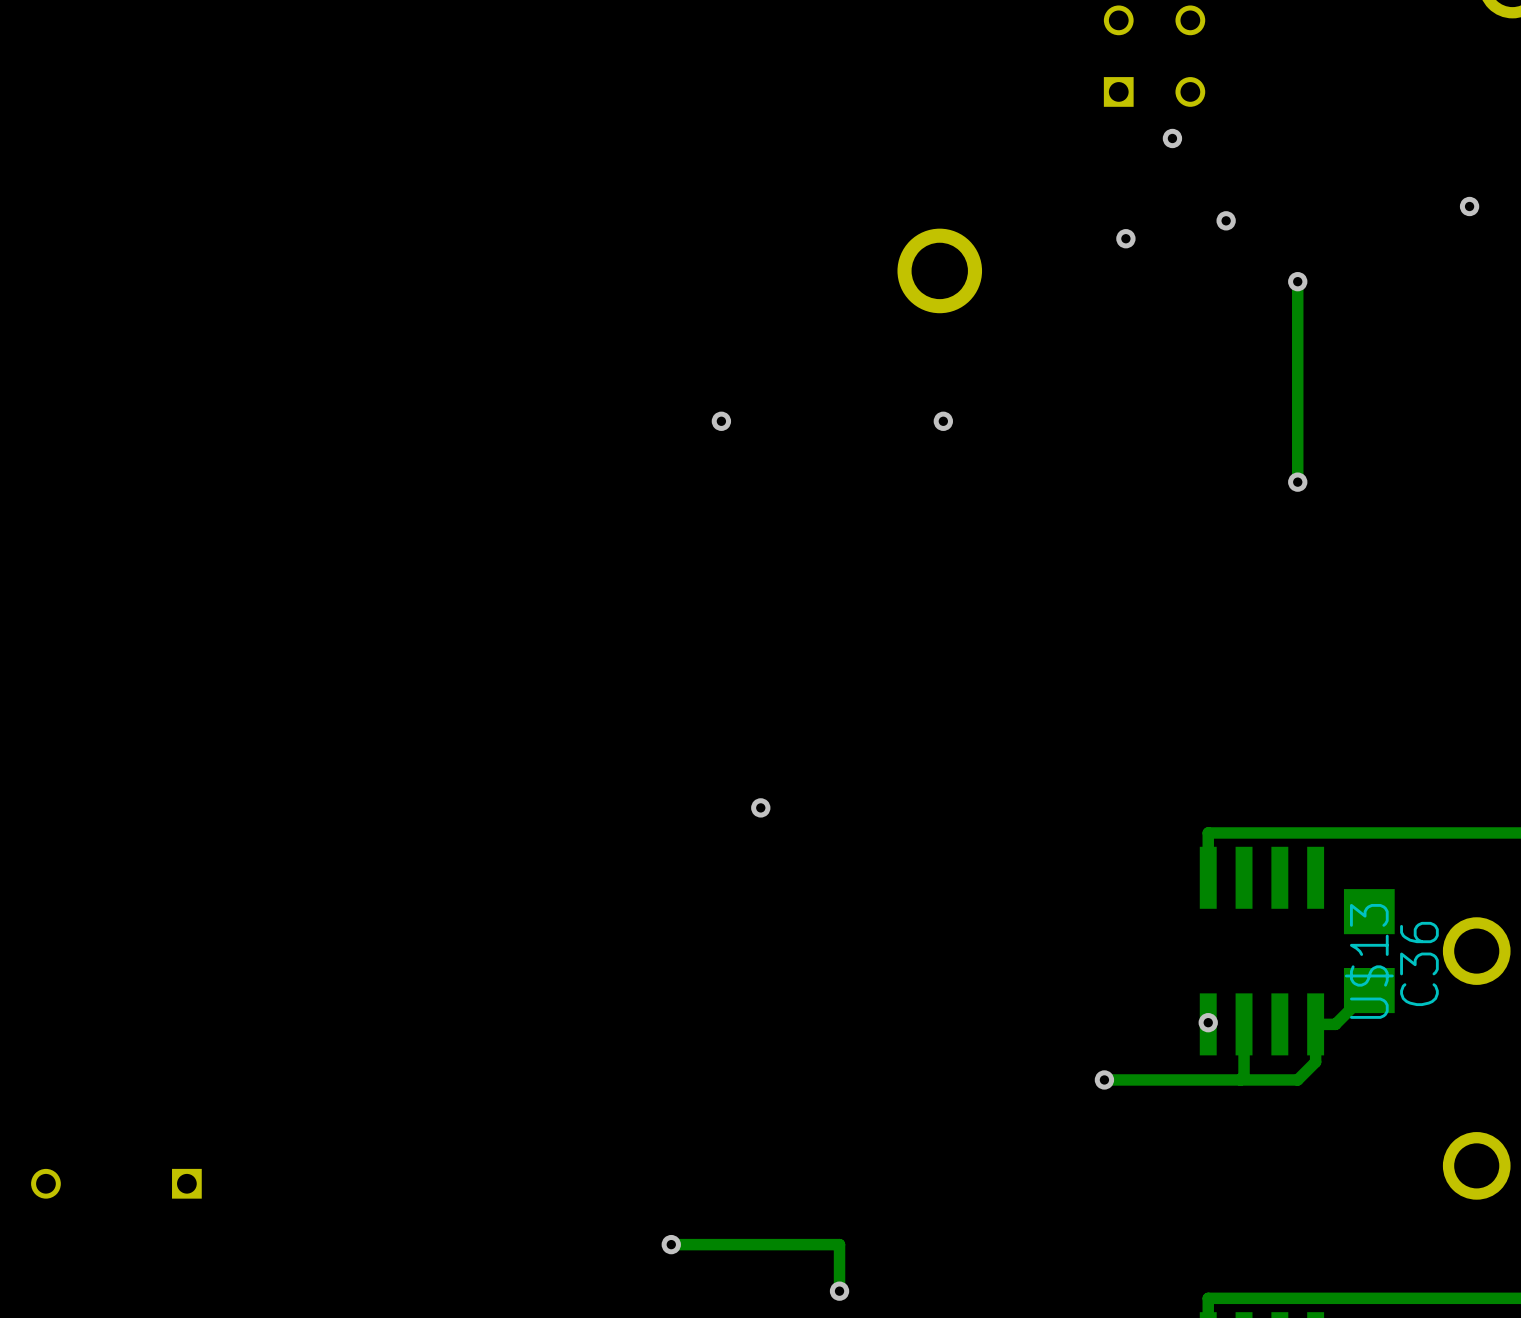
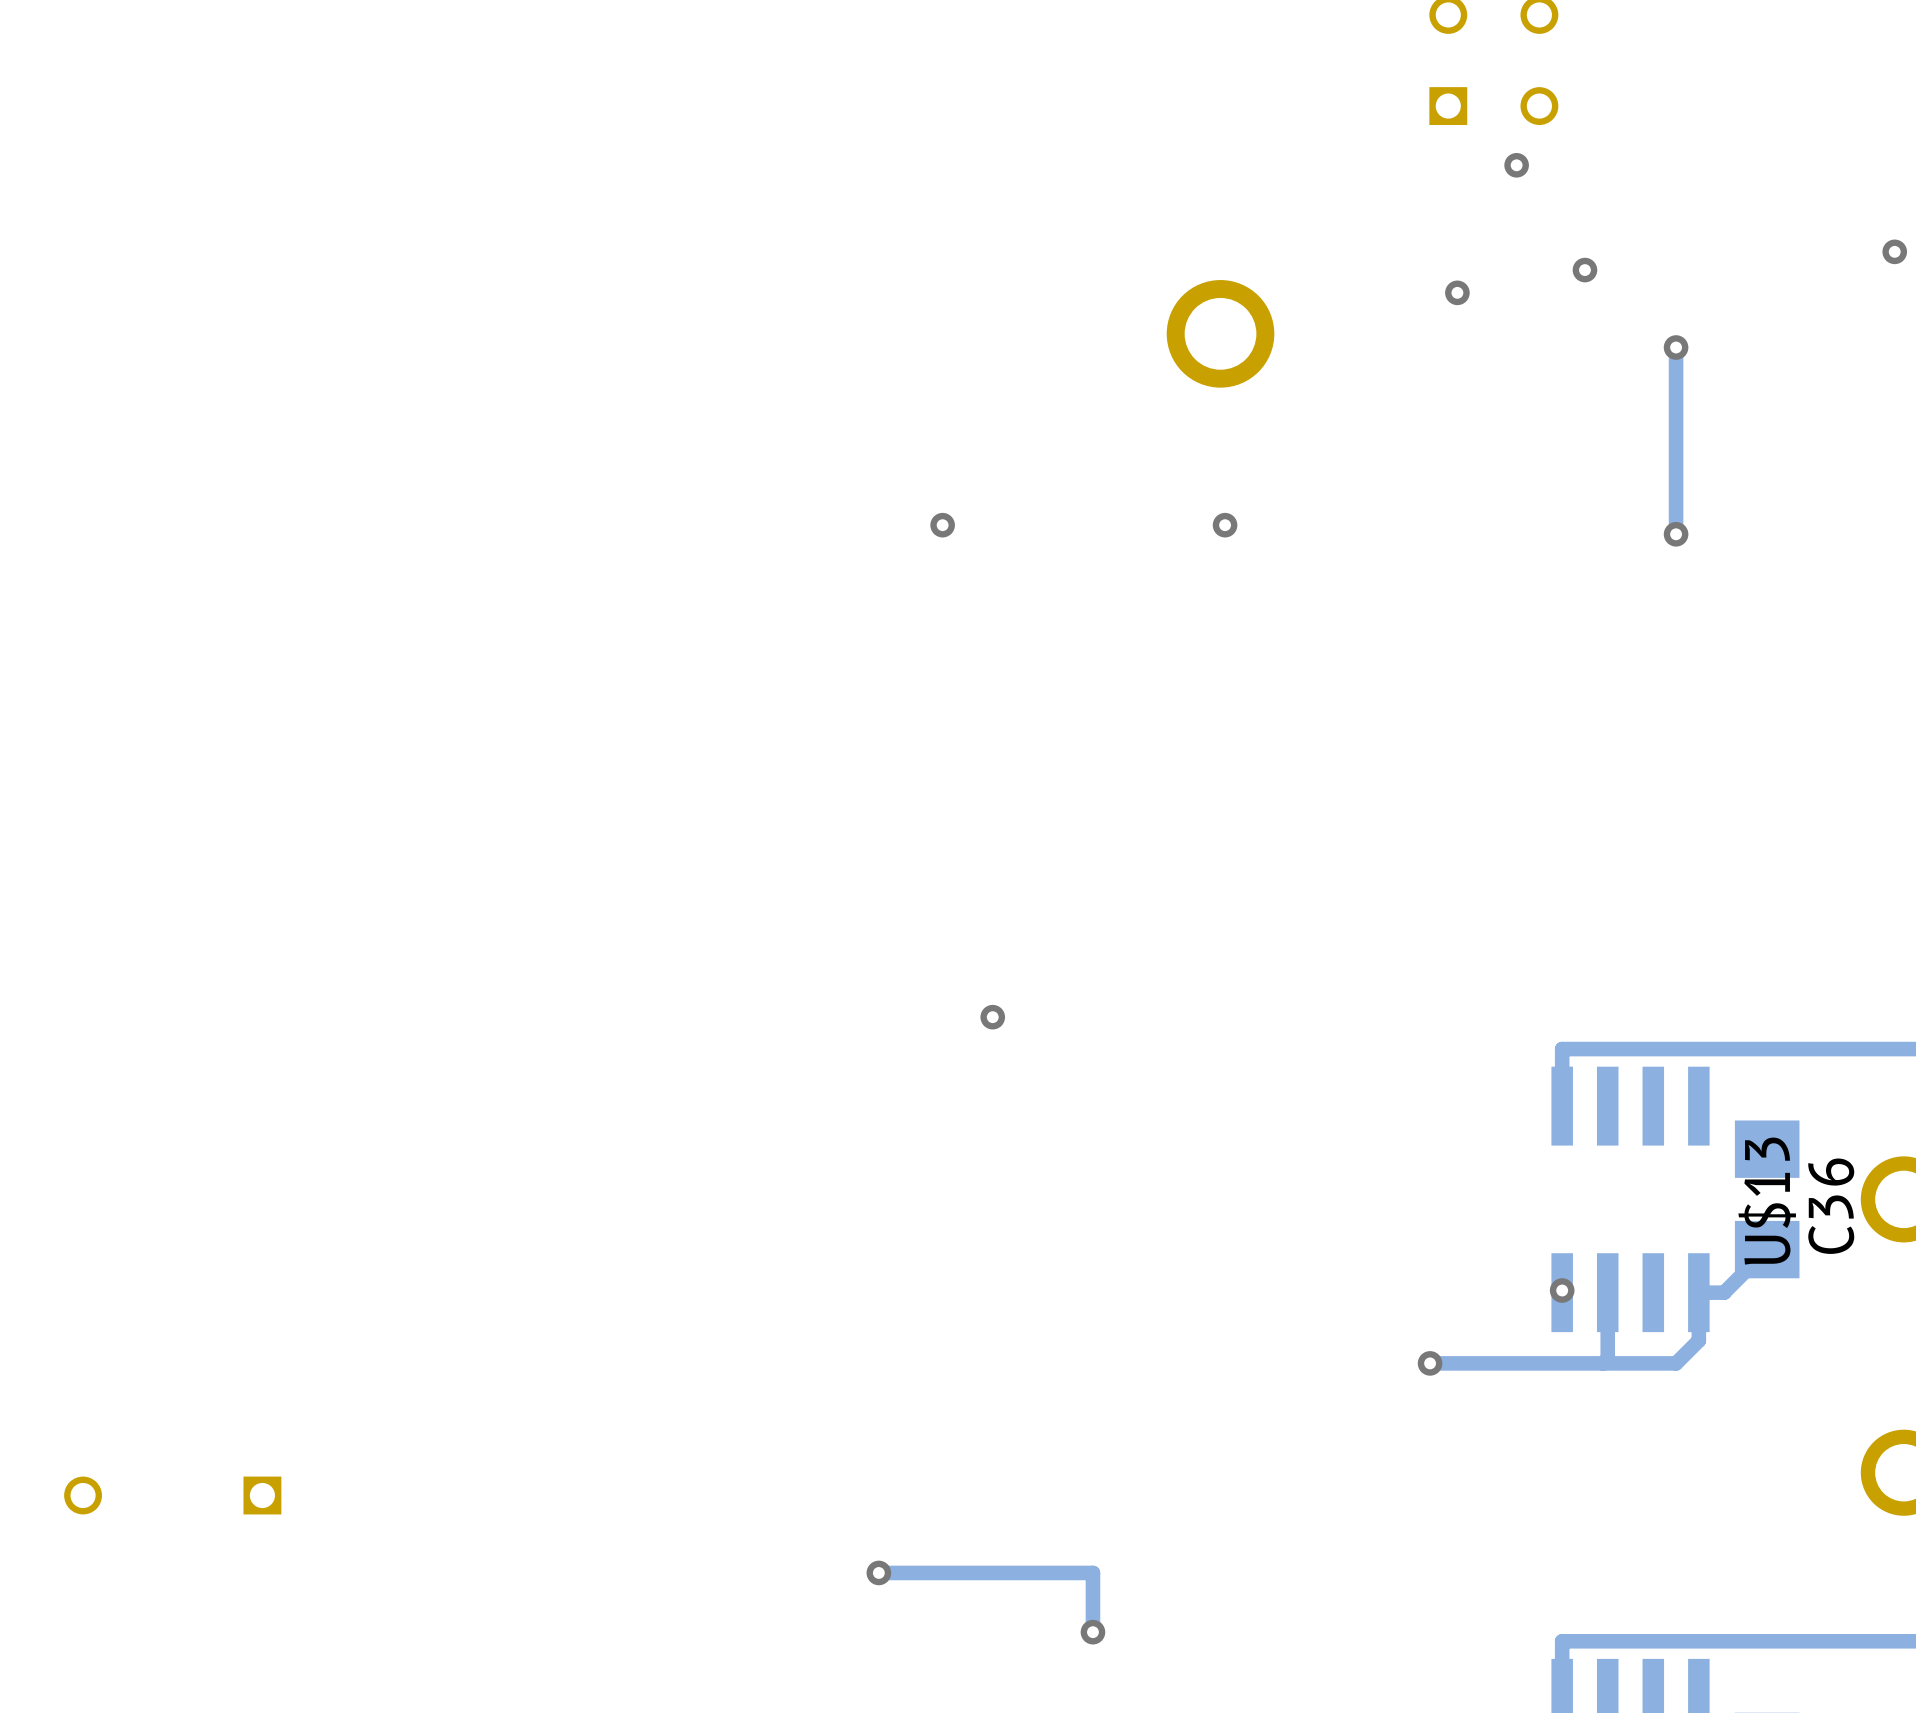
track: (1297, 428) (1297, 482) -> none
via position: (1297, 482) -> (1676, 534)

